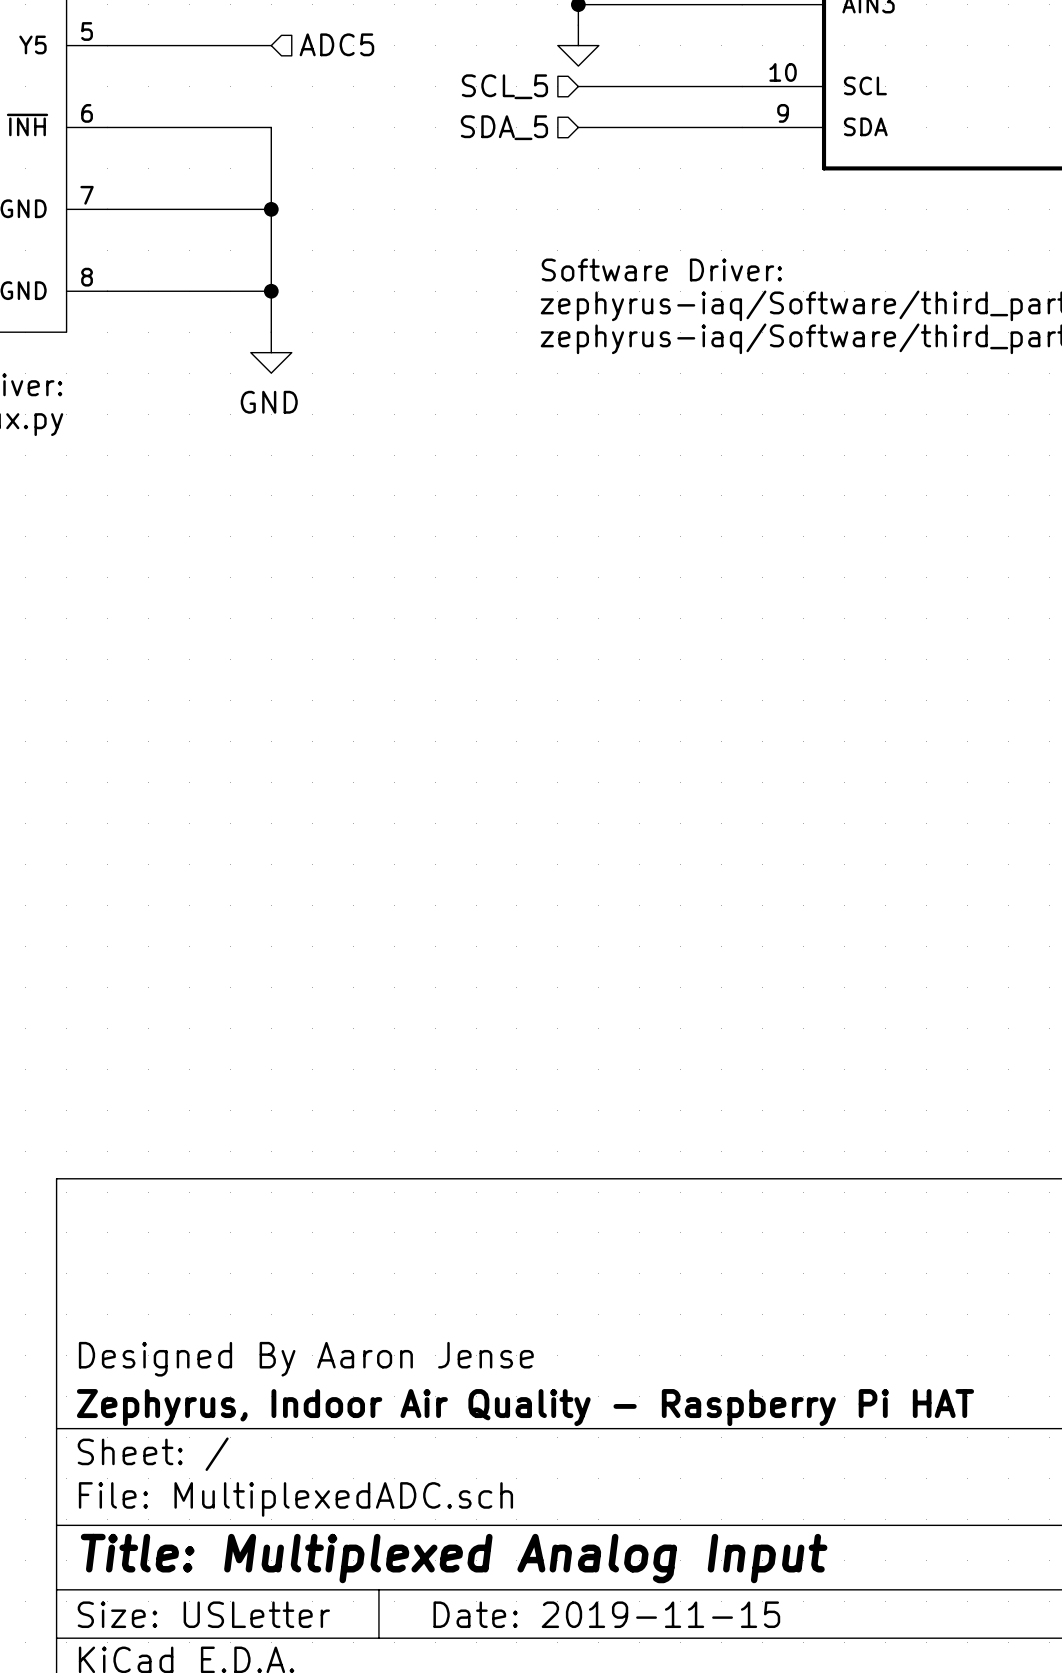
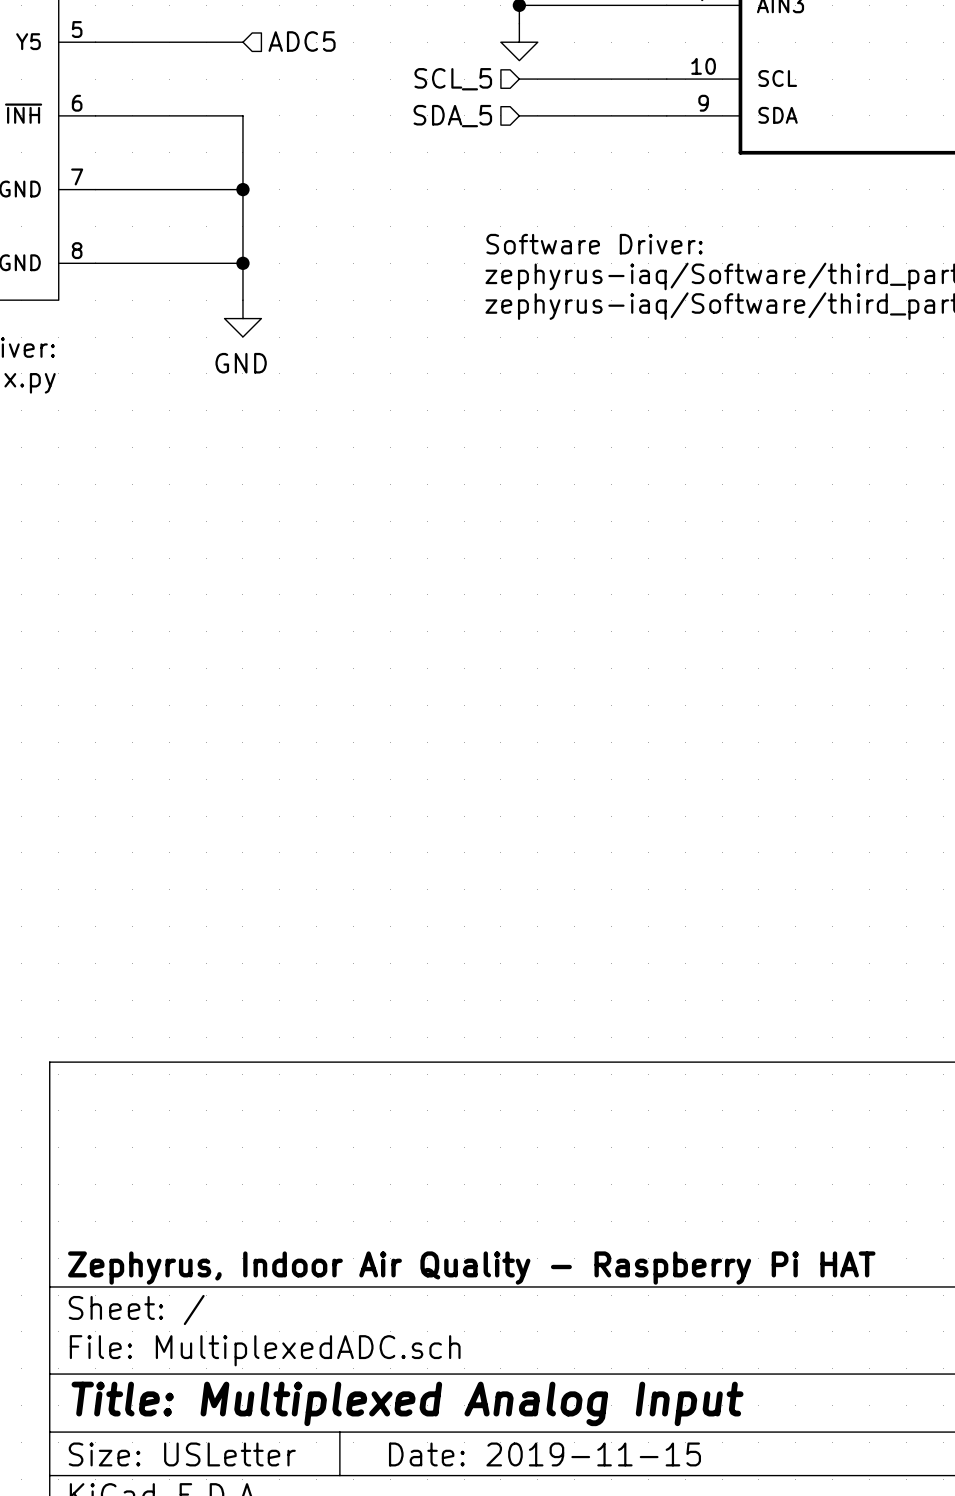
title block: Designed By Aaron Jense (306, 1359) -> none

